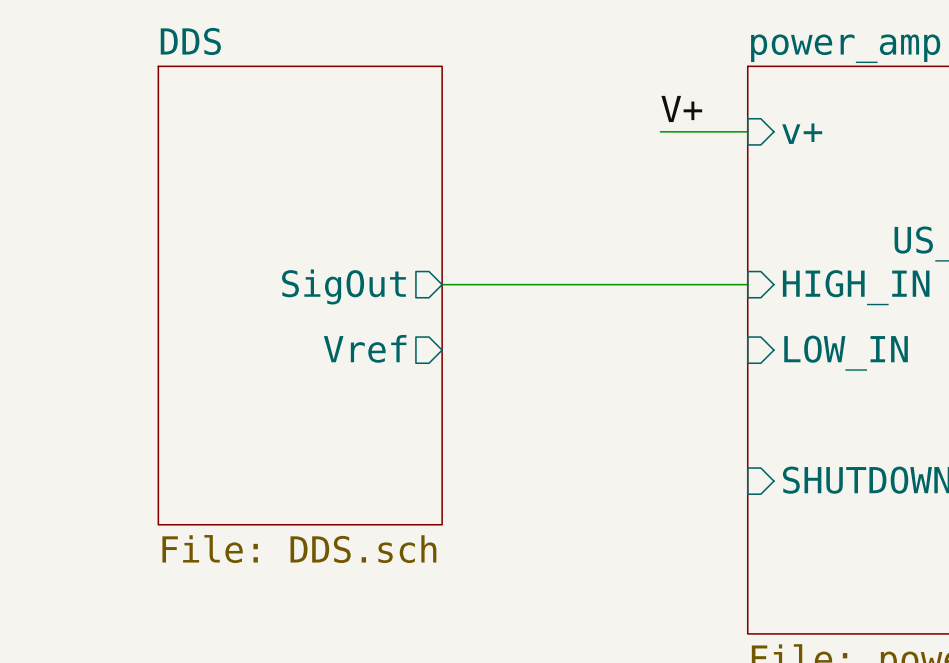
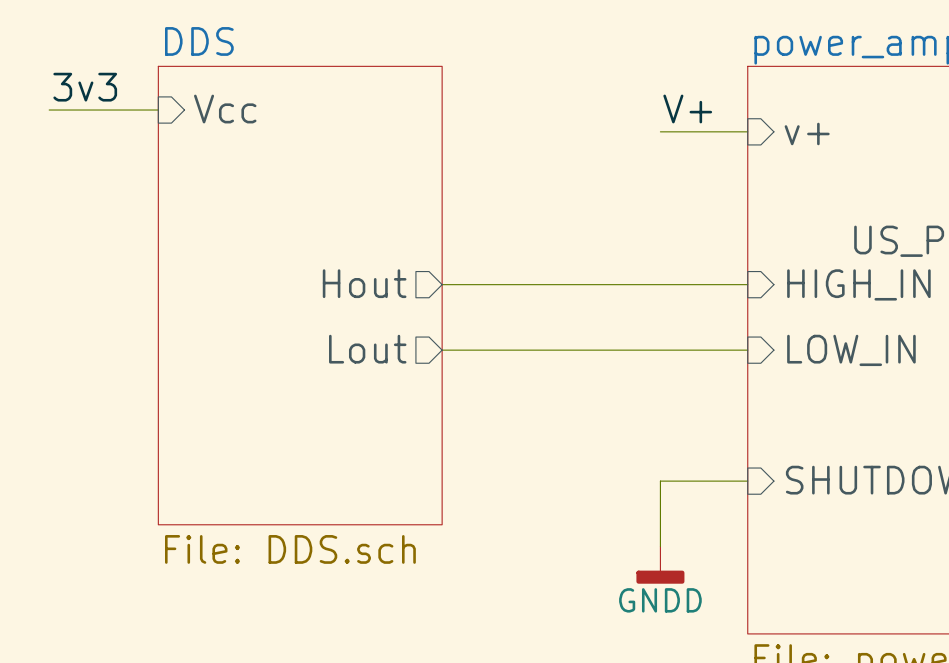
label: none -> 3v3 (85, 87)
sheet pin: none -> Vcc (225, 109)
wire: none -> (49, 110) (158, 110)
sheet pin: SigOut (343, 286) -> Hout (364, 283)
sheet pin: Vref (365, 348) -> Lout (367, 349)
wire: none -> (442, 350) (747, 350)
wire: none -> (747, 481) (660, 481) (660, 546)
power symbol: none -> GNDD (660, 565)

